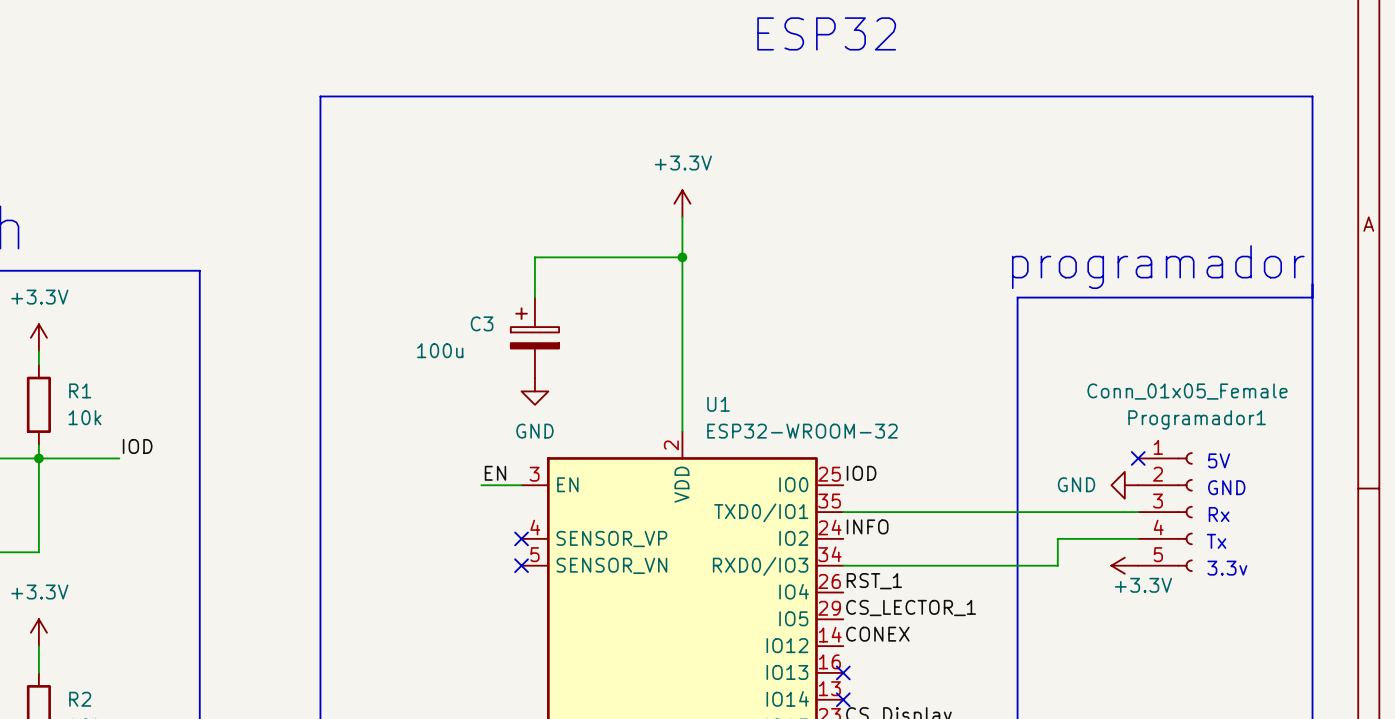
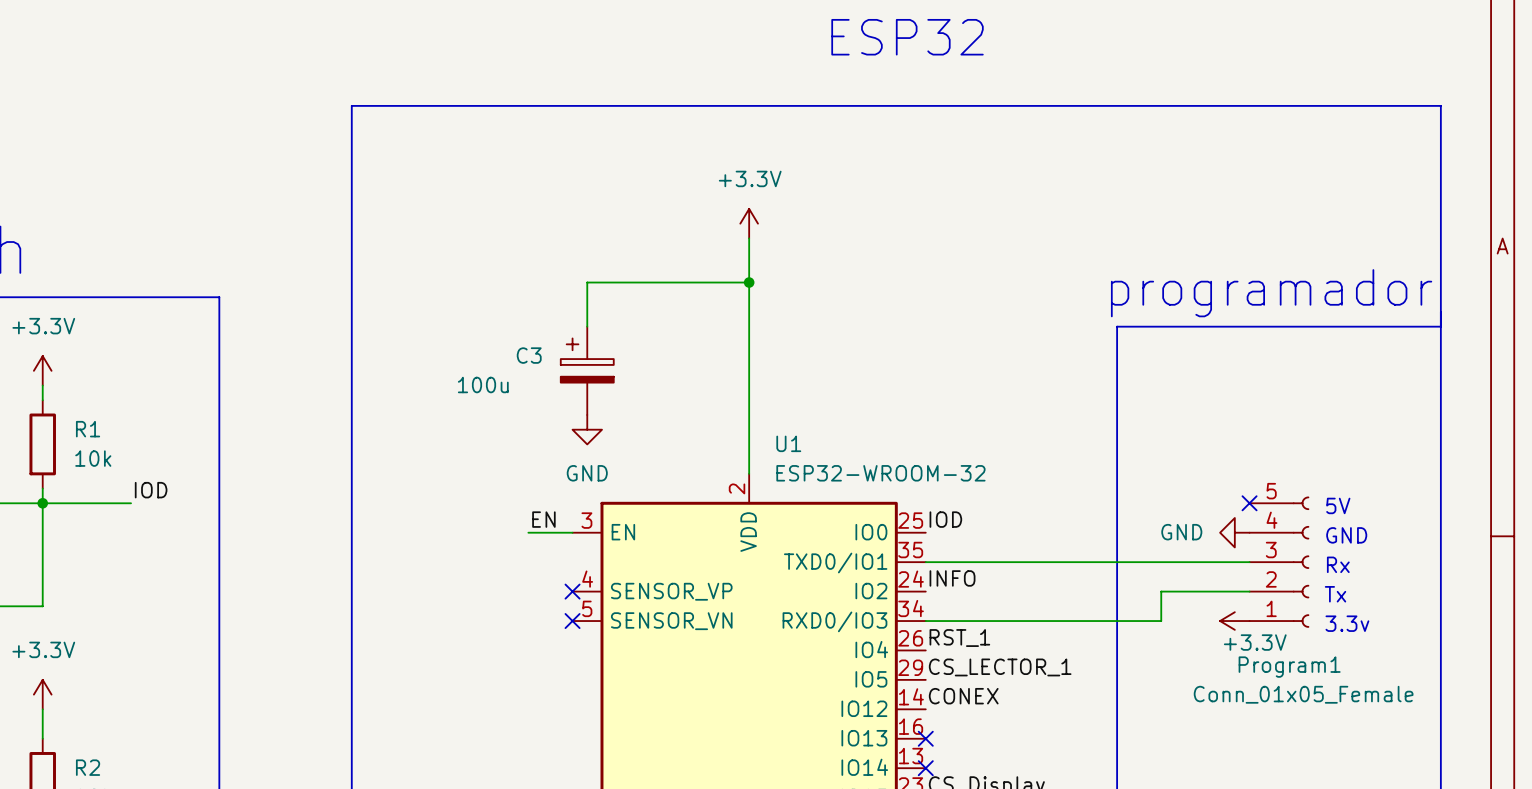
Programador1 name: Programador1 (1197, 419) -> Program1 (1289, 667)
Programador1 flip: as is (1185, 512) -> up-down (1301, 562)

